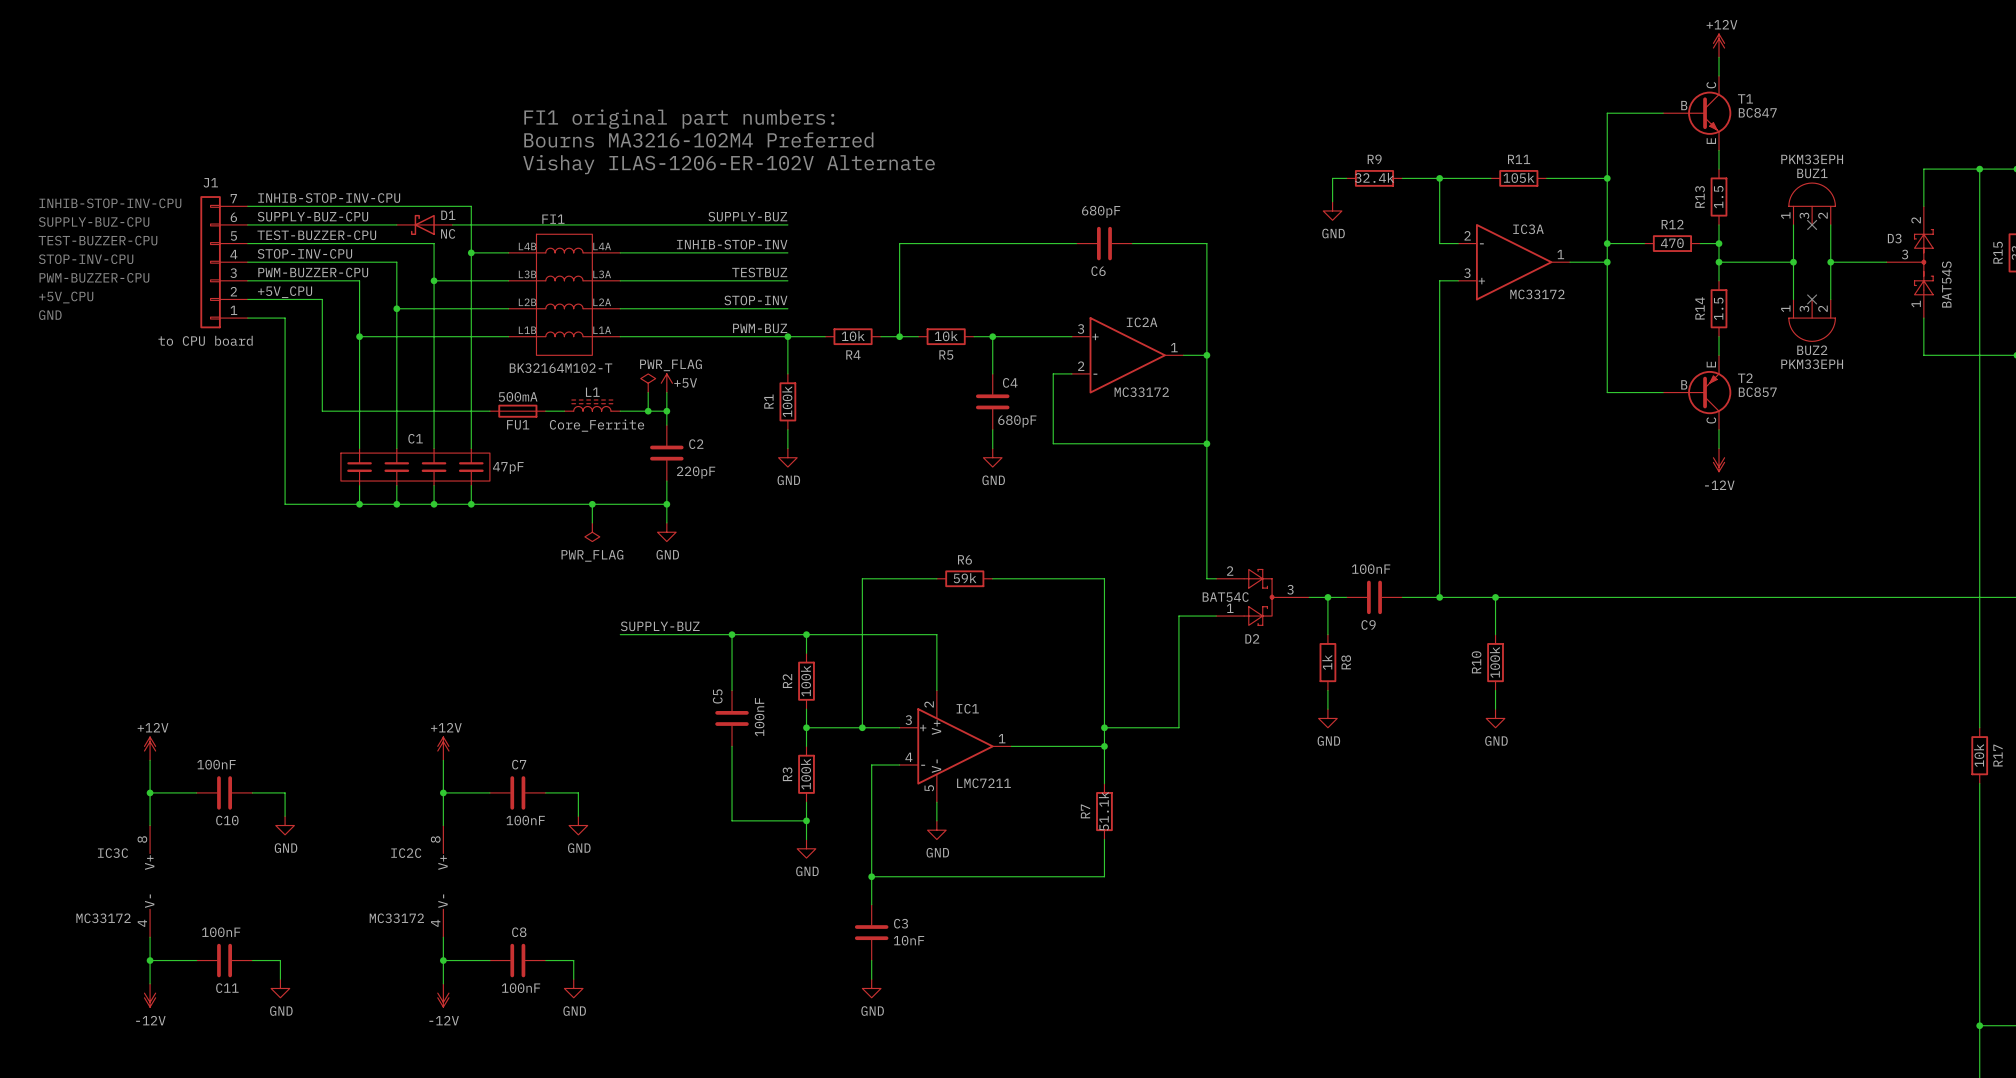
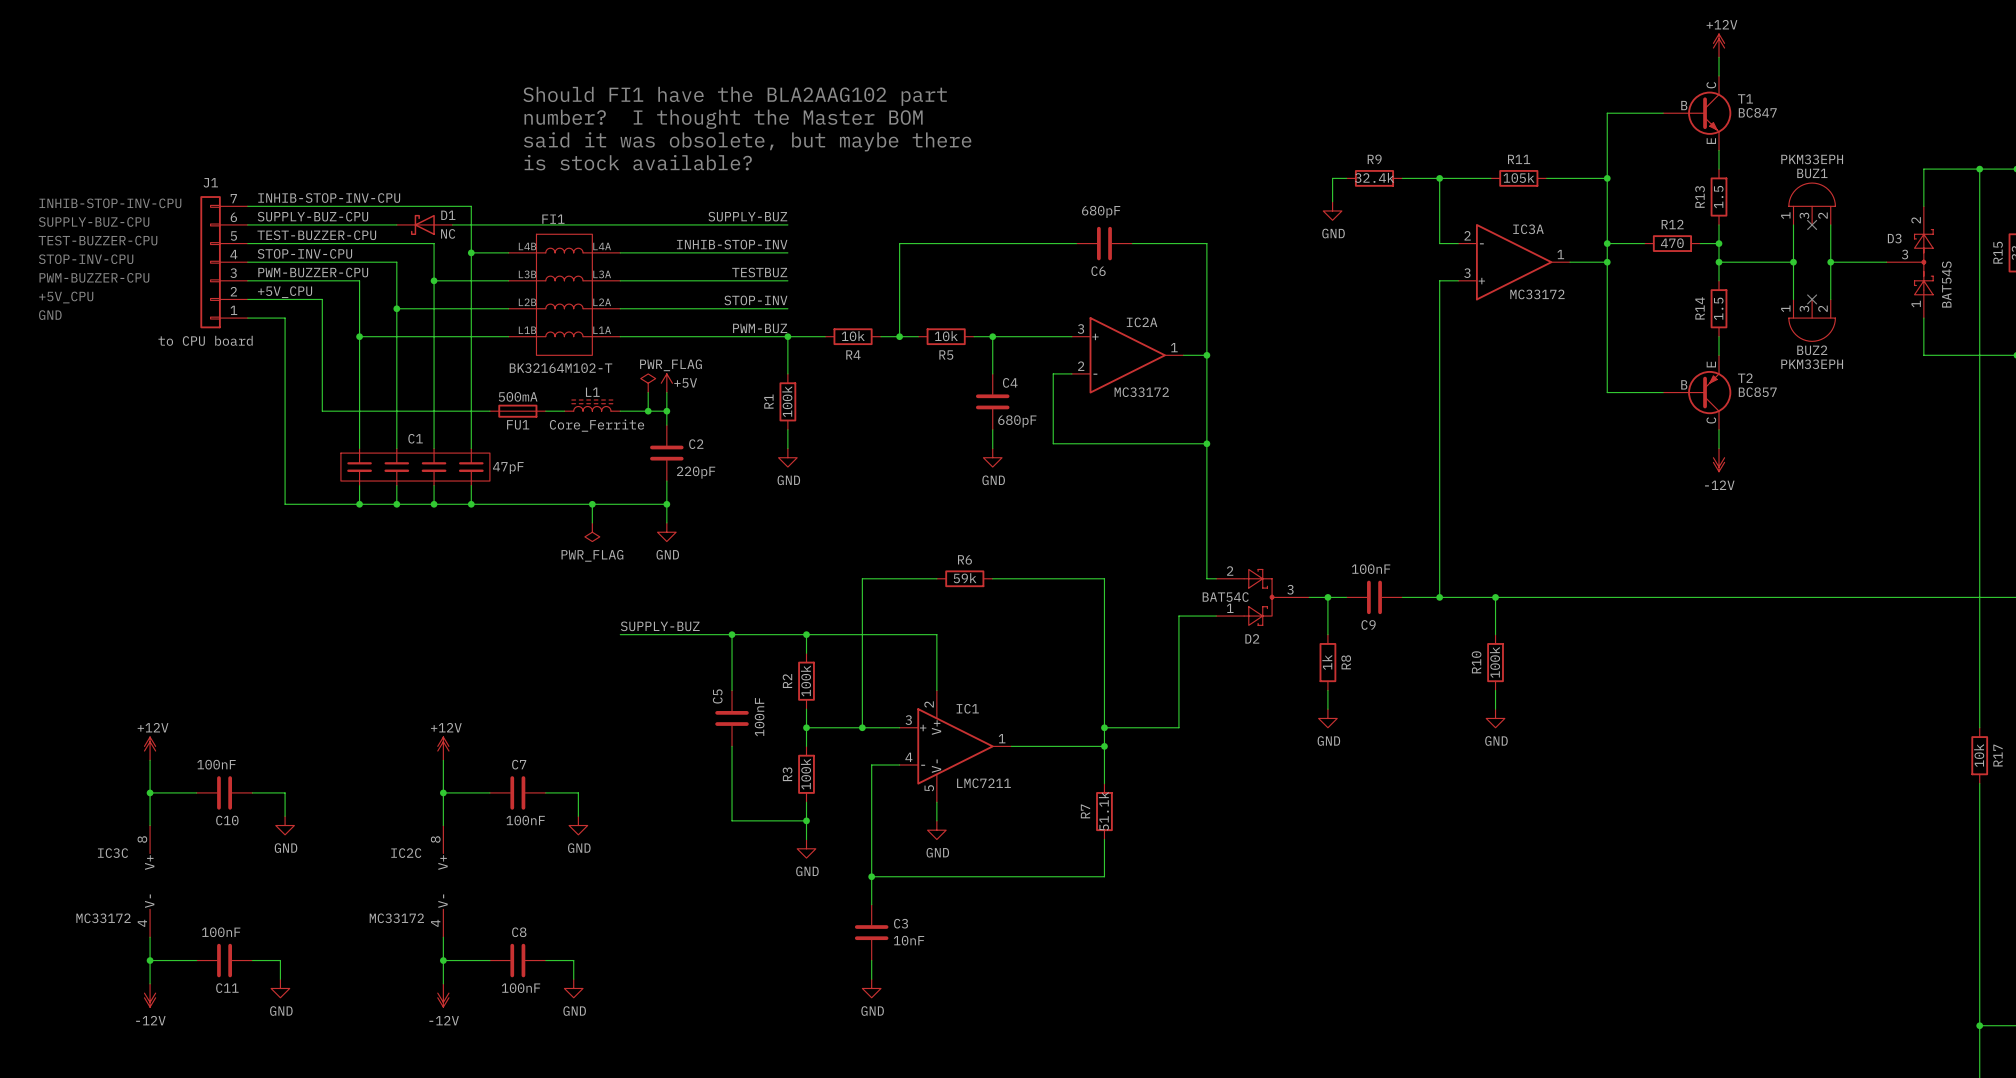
text: none -> Should FI1 have the BLA2AAG102 part (735, 96)
text: FI1 original part numbers: (679, 119) -> number? I thought the Master BOM (723, 119)
text: Bourns MA3216-102M4 Preferred (698, 140) -> said it was obsolete, but maybe there (747, 141)
text: Vishay ILAS-1206-ER-102V Alternate (729, 164) -> is stock available? (638, 162)

